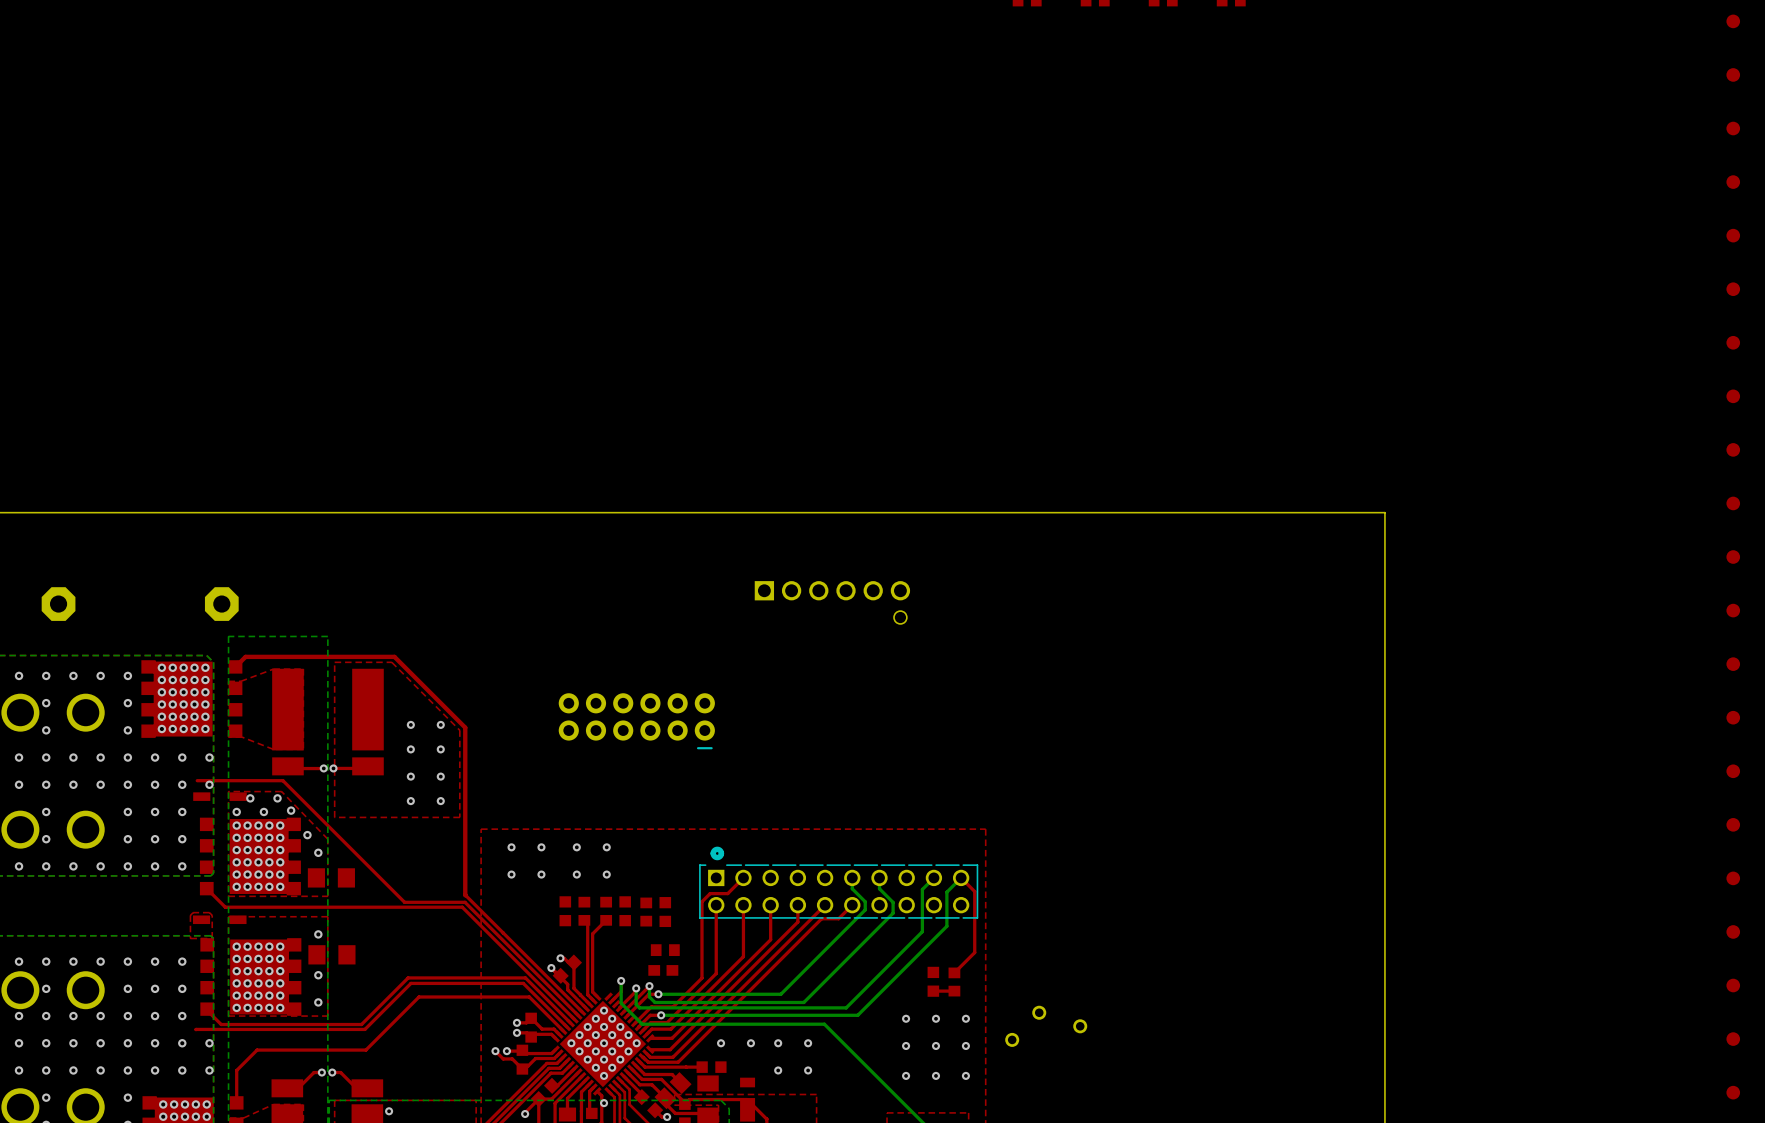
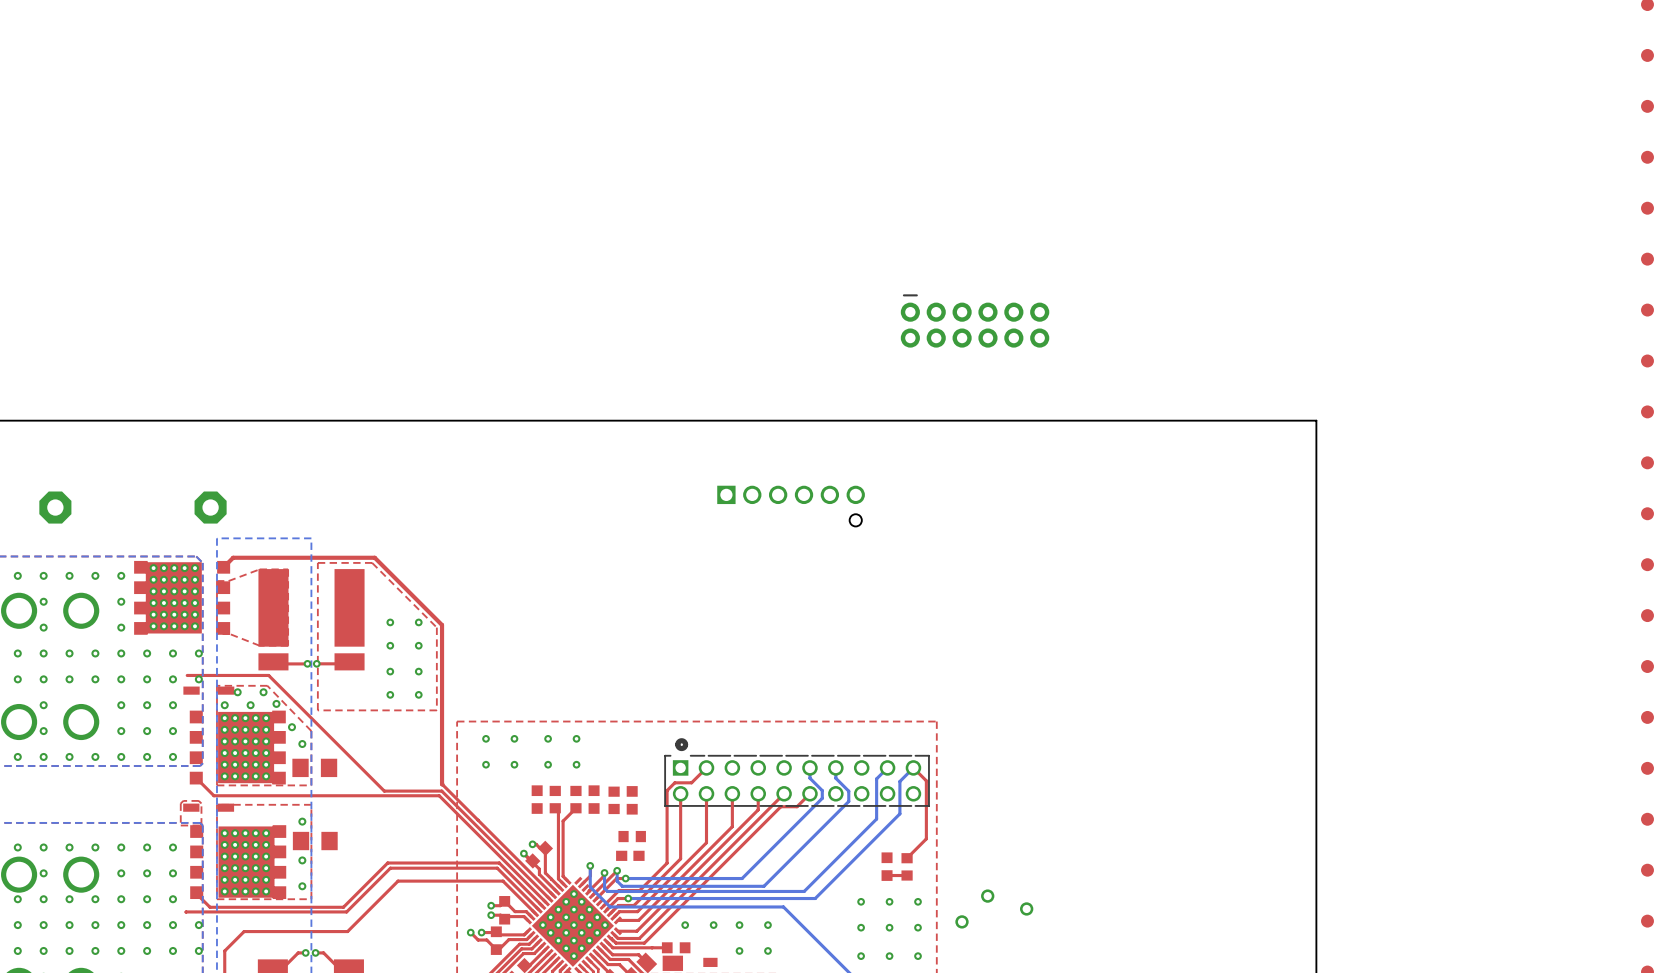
part: none -> (975, 320)
part: (636, 721) -> none

